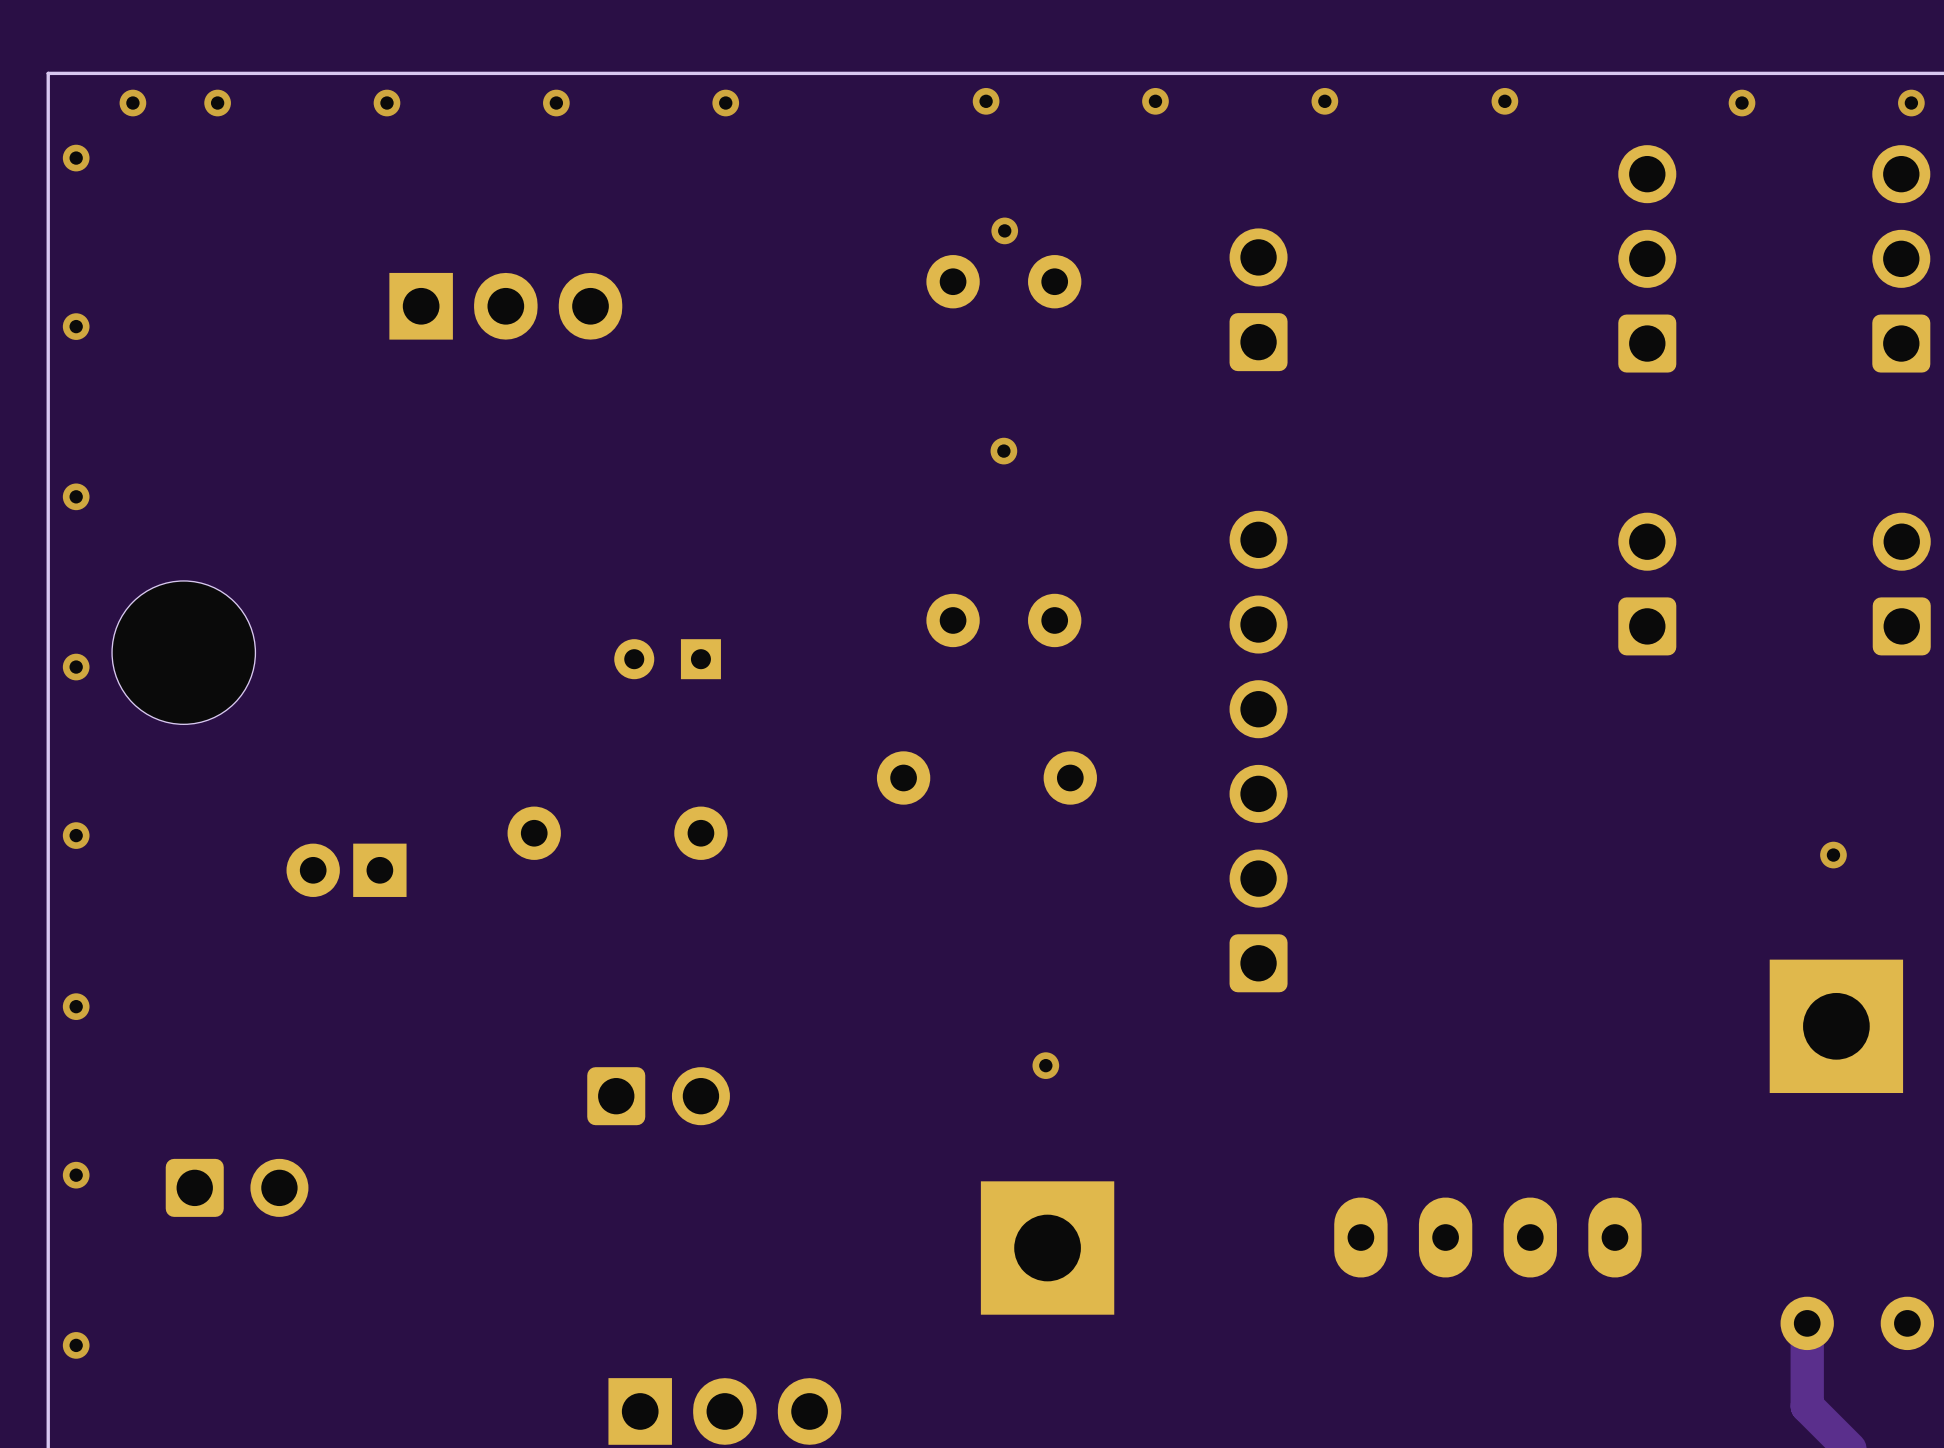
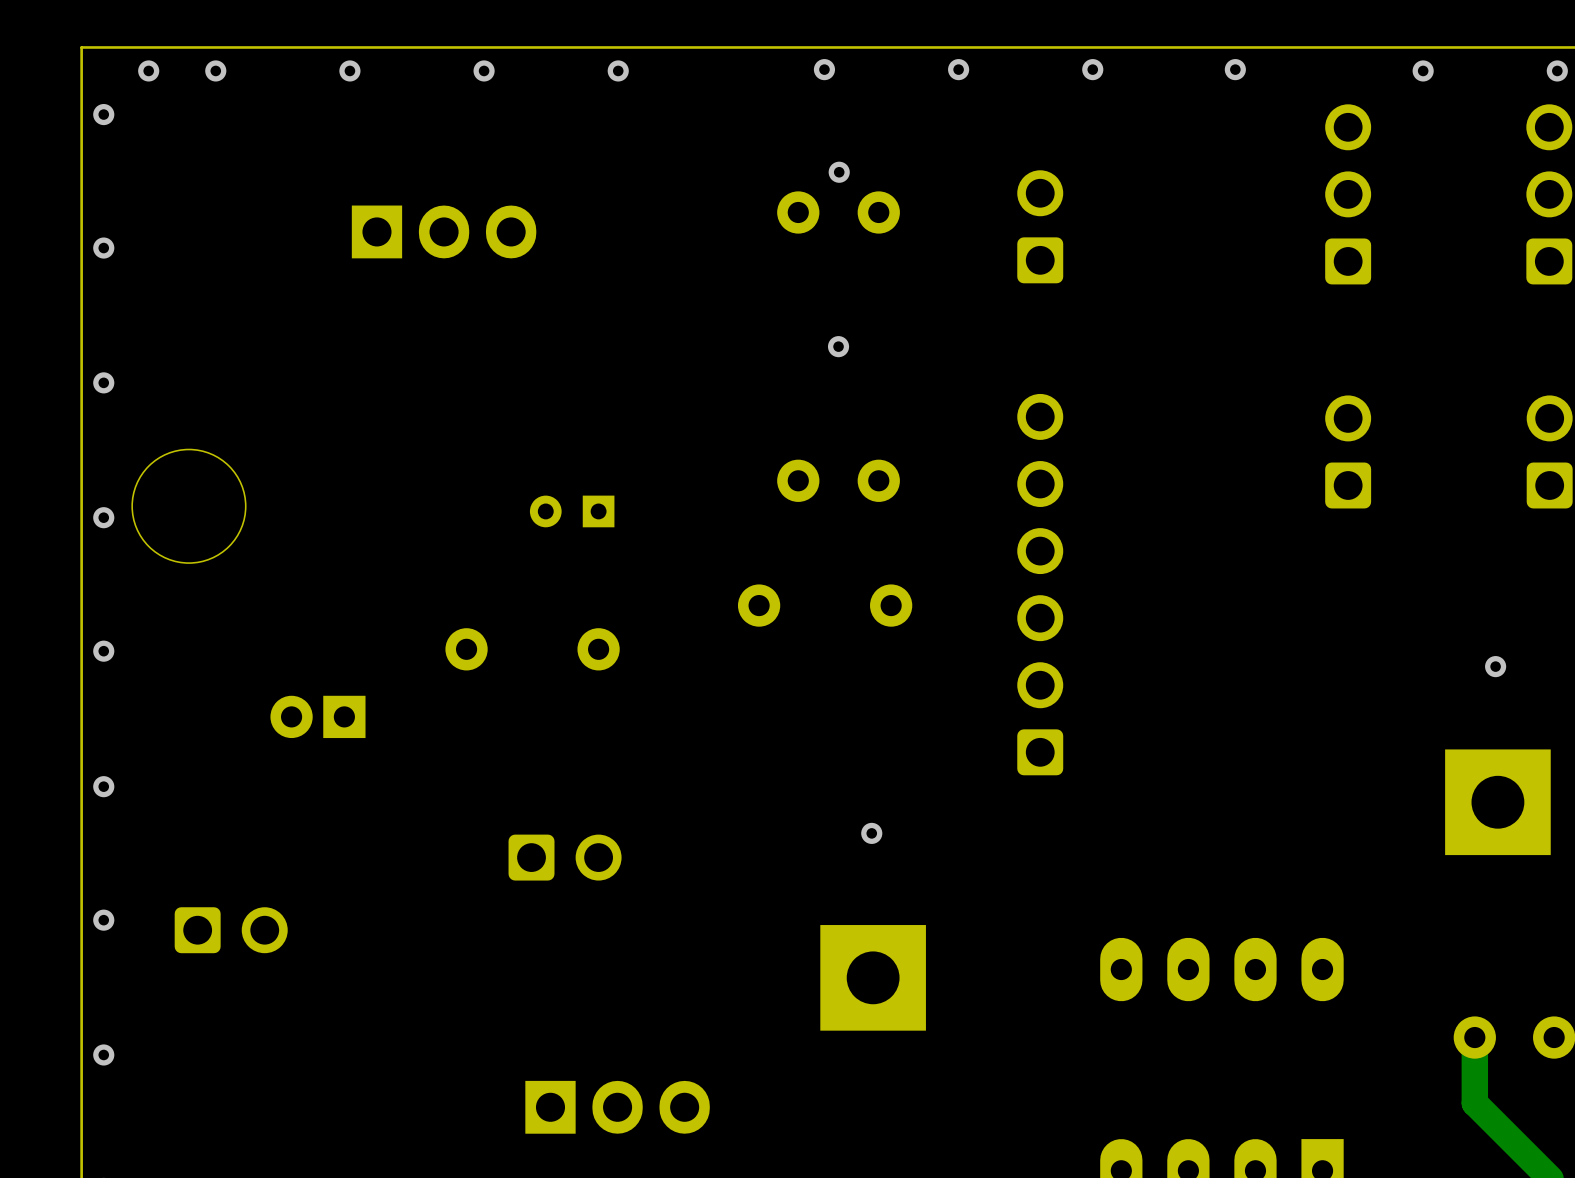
part position: (346, 870) -> (317, 716)

